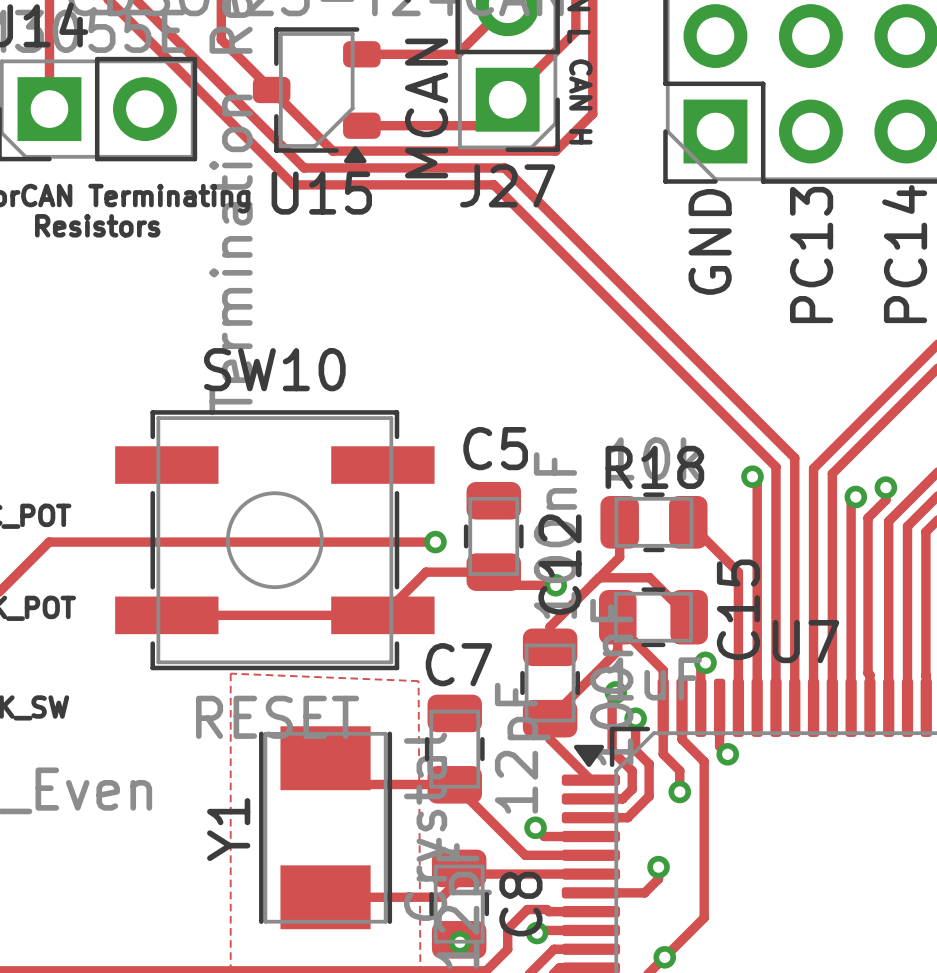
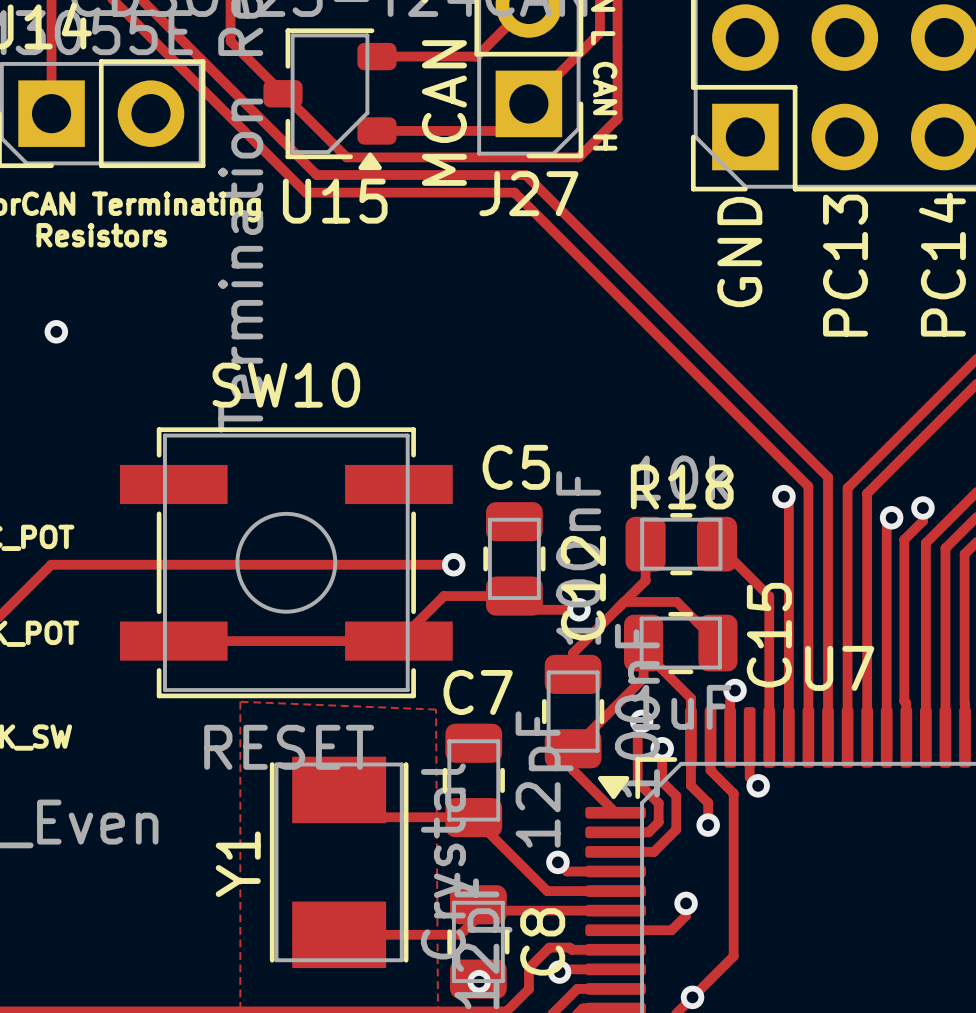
via: none -> (56, 331)

